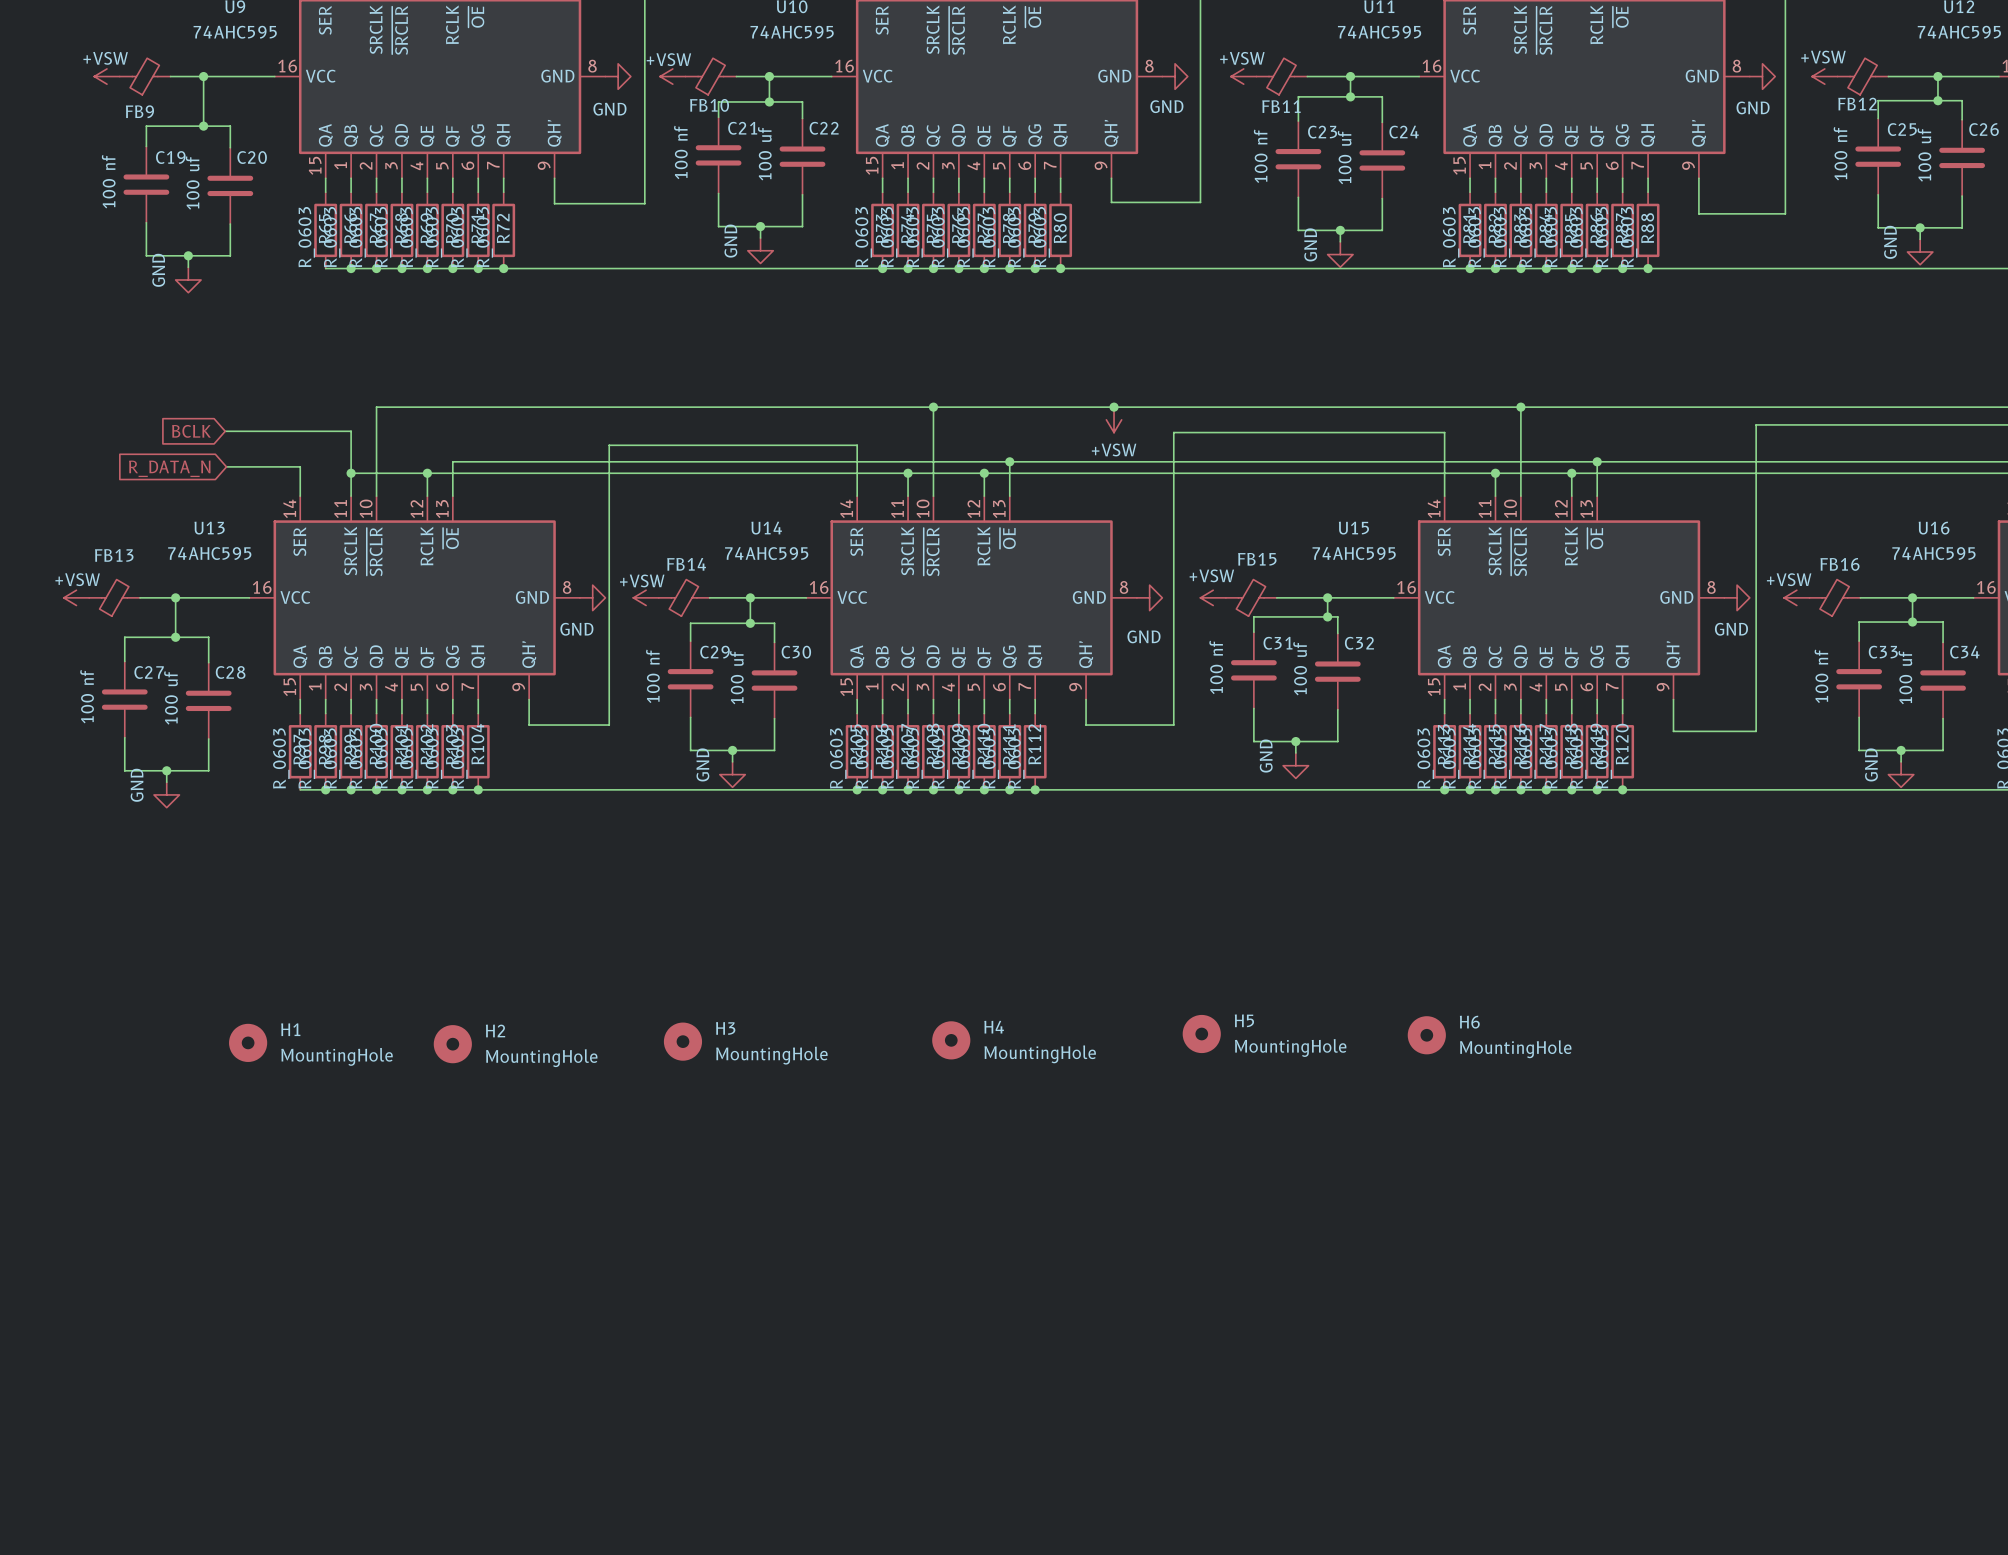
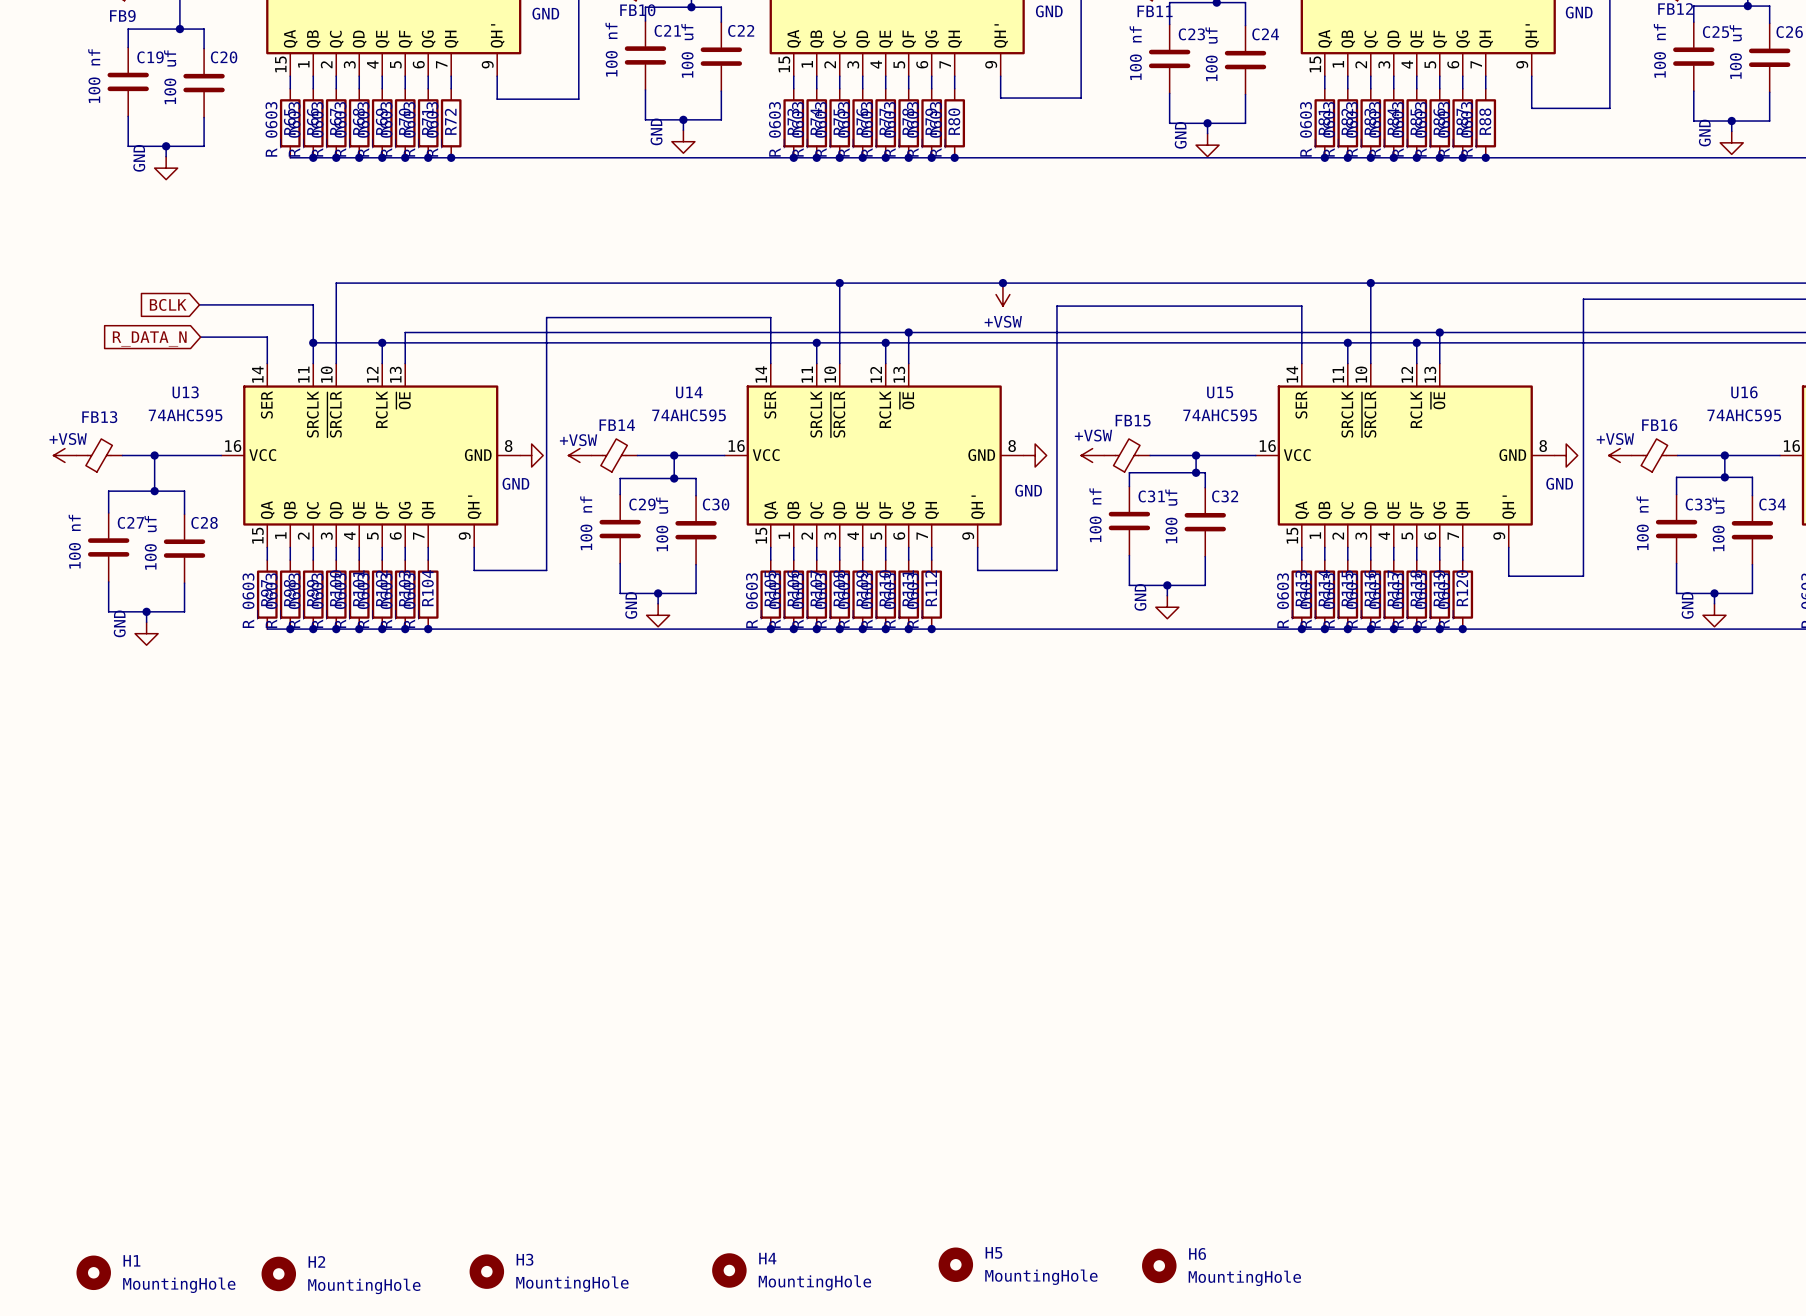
H5 position: (1201, 1034) -> (955, 1264)
H6 position: (1426, 1035) -> (1159, 1265)
H4 position: (951, 1040) -> (729, 1270)
H3 position: (682, 1041) -> (486, 1271)
H1 position: (248, 1042) -> (93, 1272)
H2 position: (452, 1044) -> (278, 1273)

